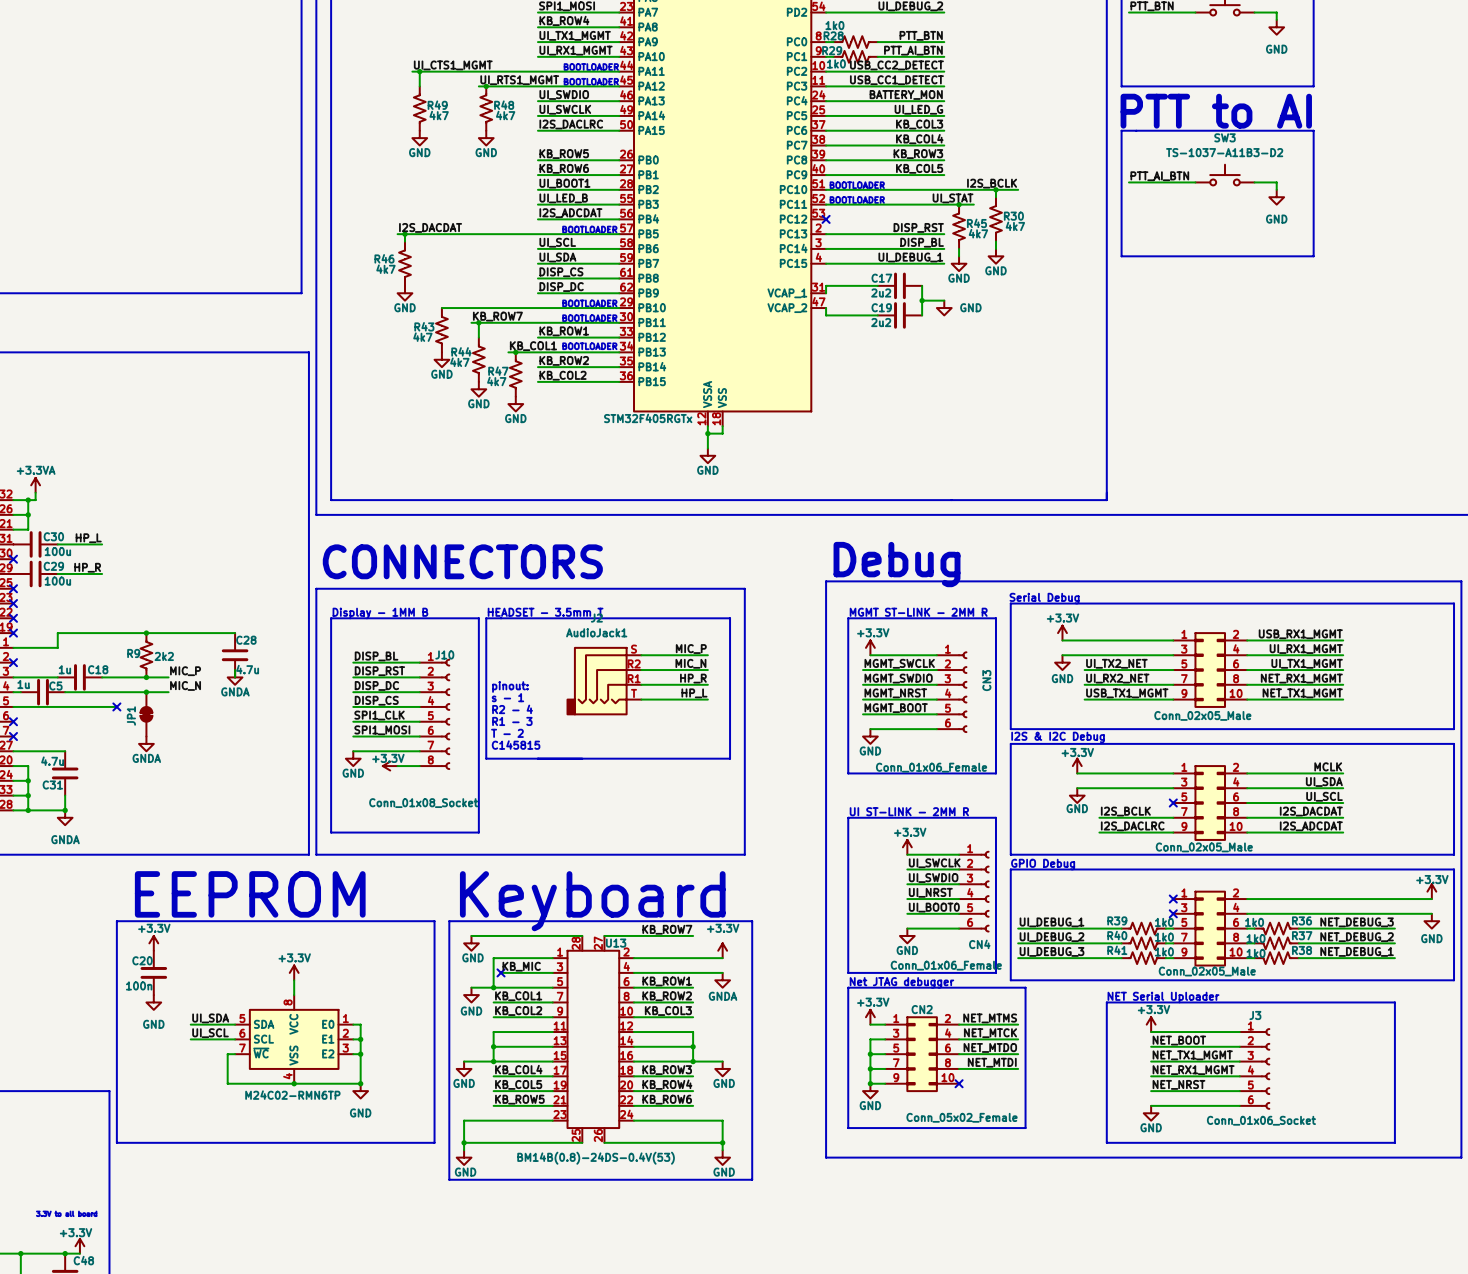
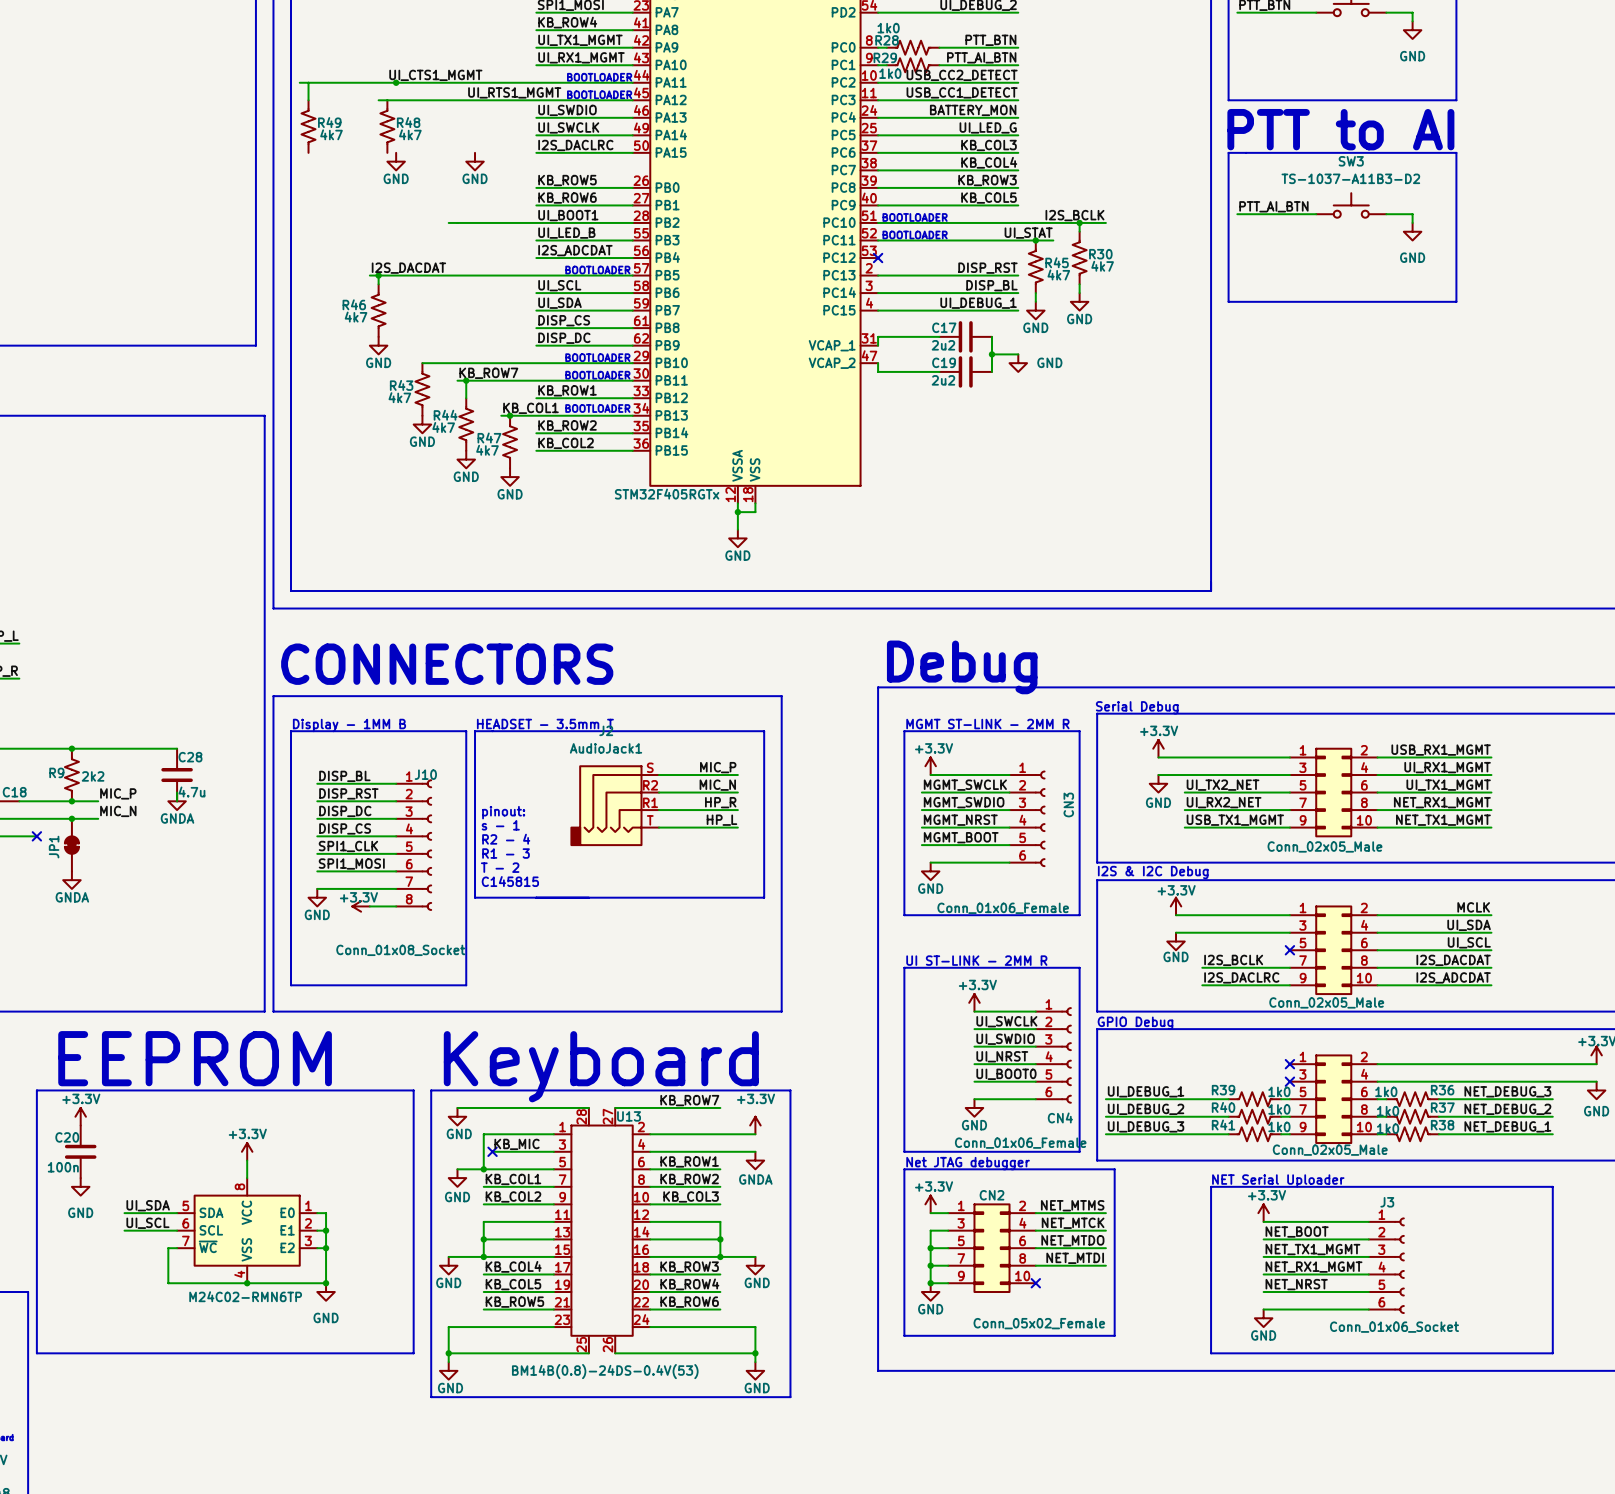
wire: none -> (299, 82) (387, 82)
wire: (419, 71) (419, 86) -> (308, 82) (308, 100)
wire: none -> (378, 100) (466, 100)
junction: (486, 86) -> none
R49 position: (419, 108) -> (308, 126)
R48 position: (486, 108) -> (387, 126)
wire: none -> (448, 222) (536, 222)

